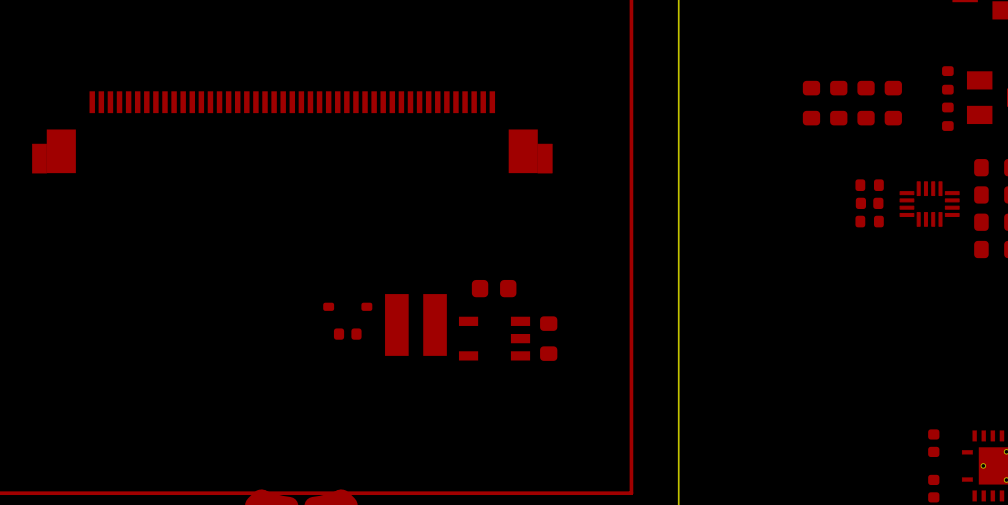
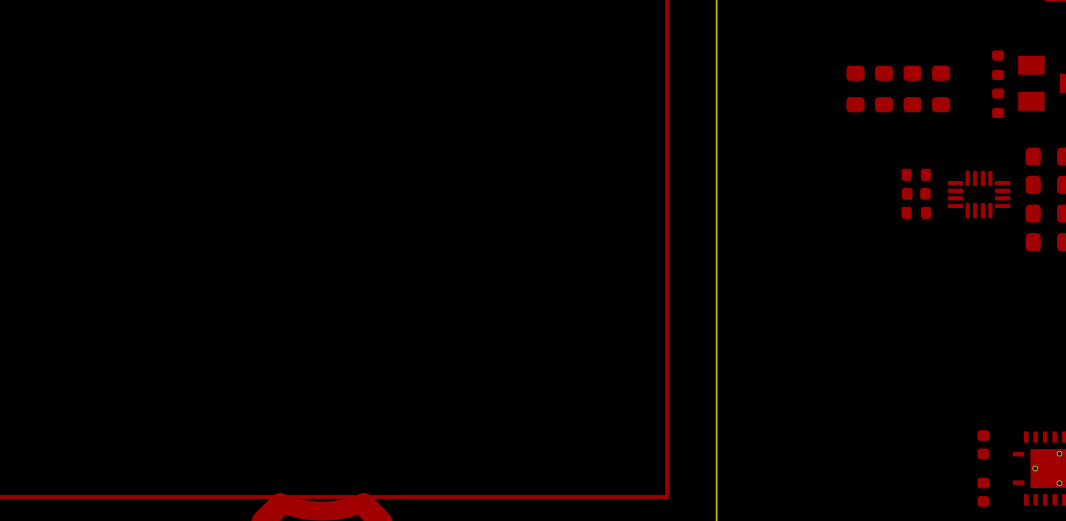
part: (292, 132) -> none
part: (494, 288) -> none
part: (347, 306) -> none
part: (415, 324) -> none
part: (347, 334) -> none
part: (494, 338) -> none
part: (548, 338) -> none

